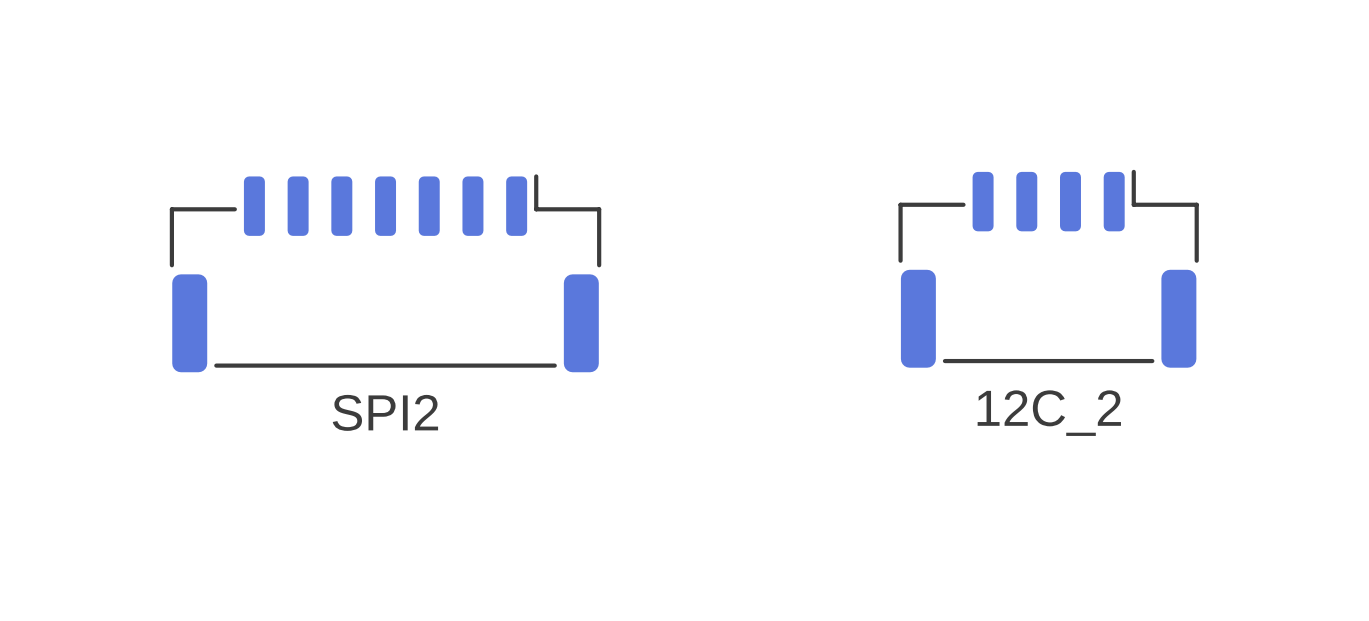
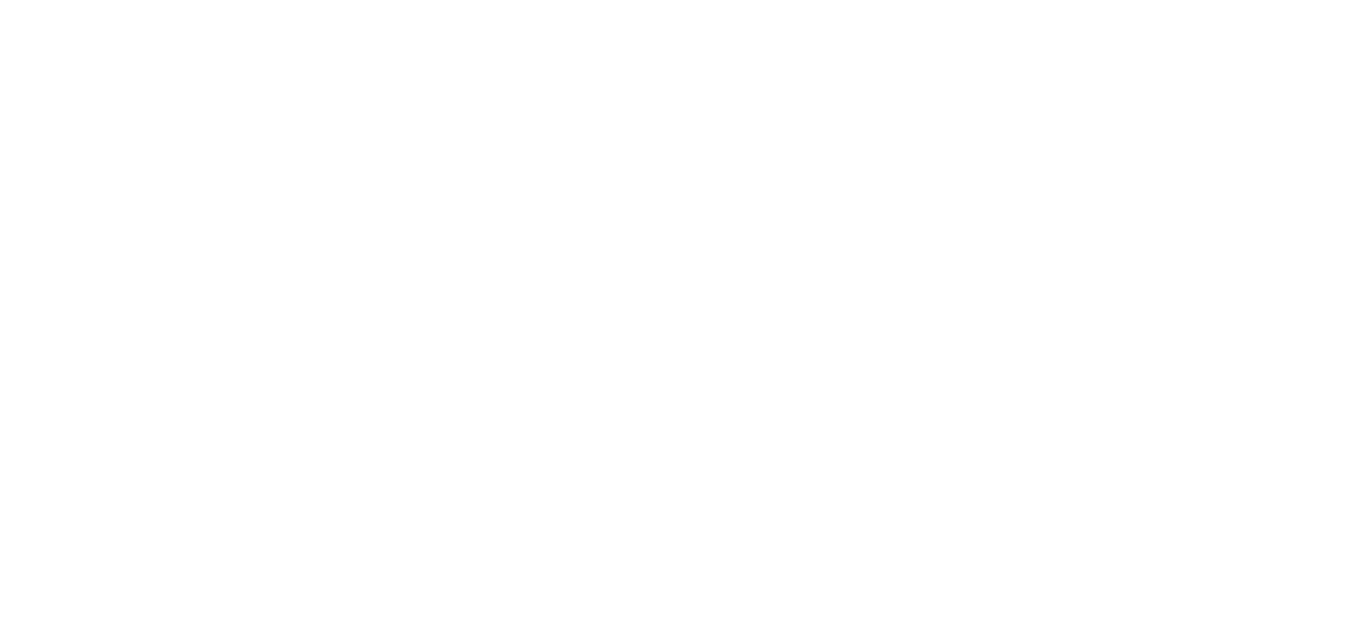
12C_2: (1048, 268) -> none
SPI2: (385, 273) -> none

